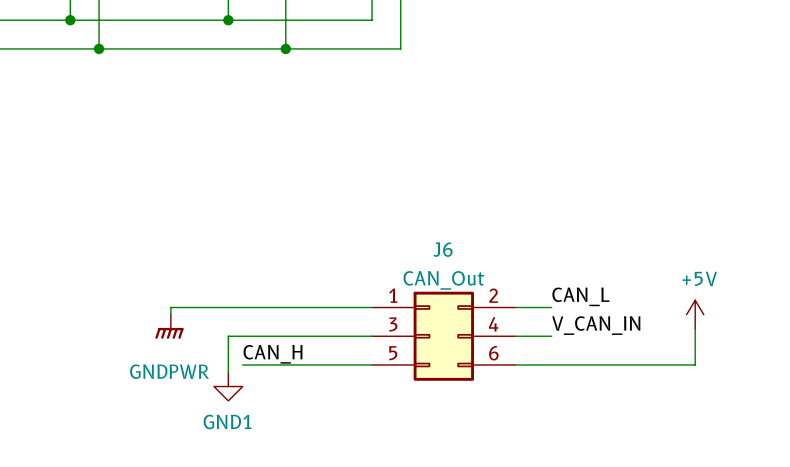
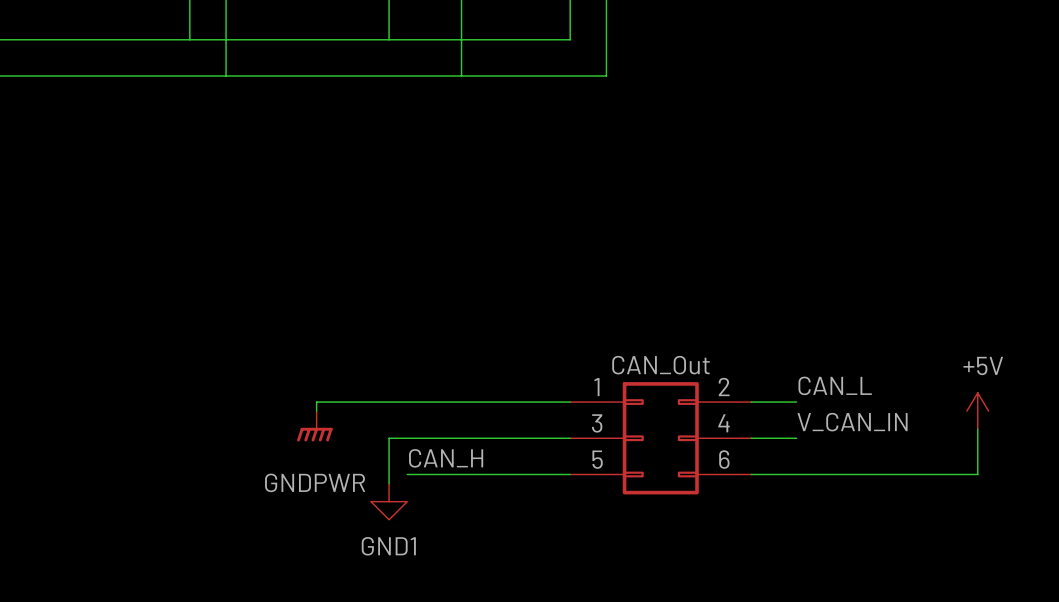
junction: (70, 20) -> none
junction: (228, 20) -> none
junction: (99, 48) -> none
junction: (285, 48) -> none
J6 name: J6 (442, 249) -> none

